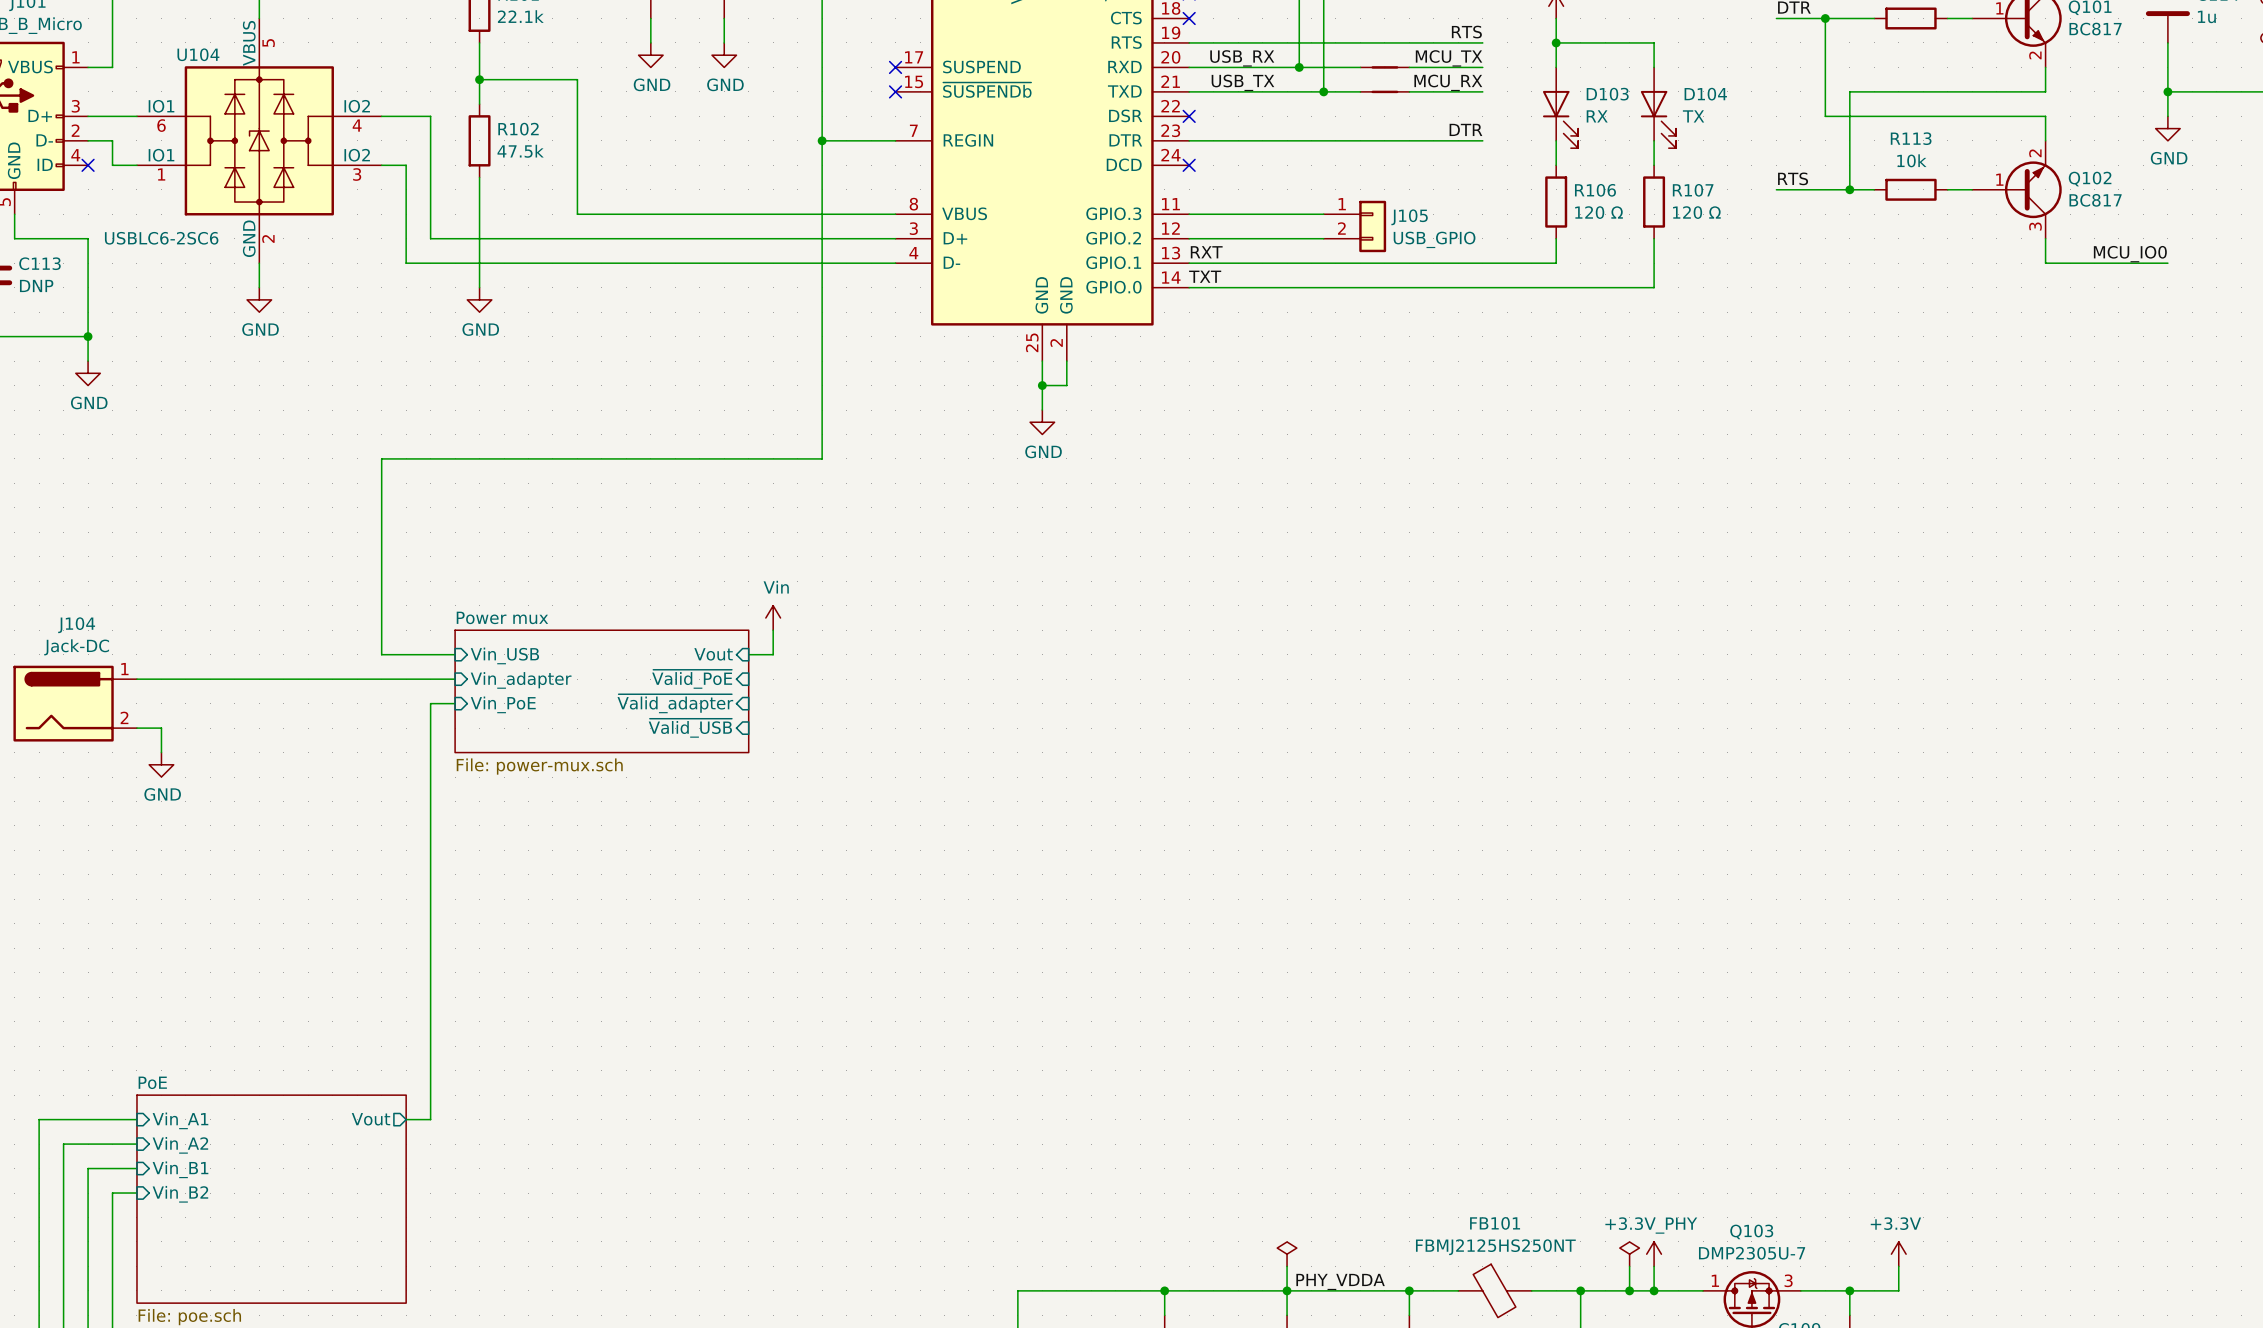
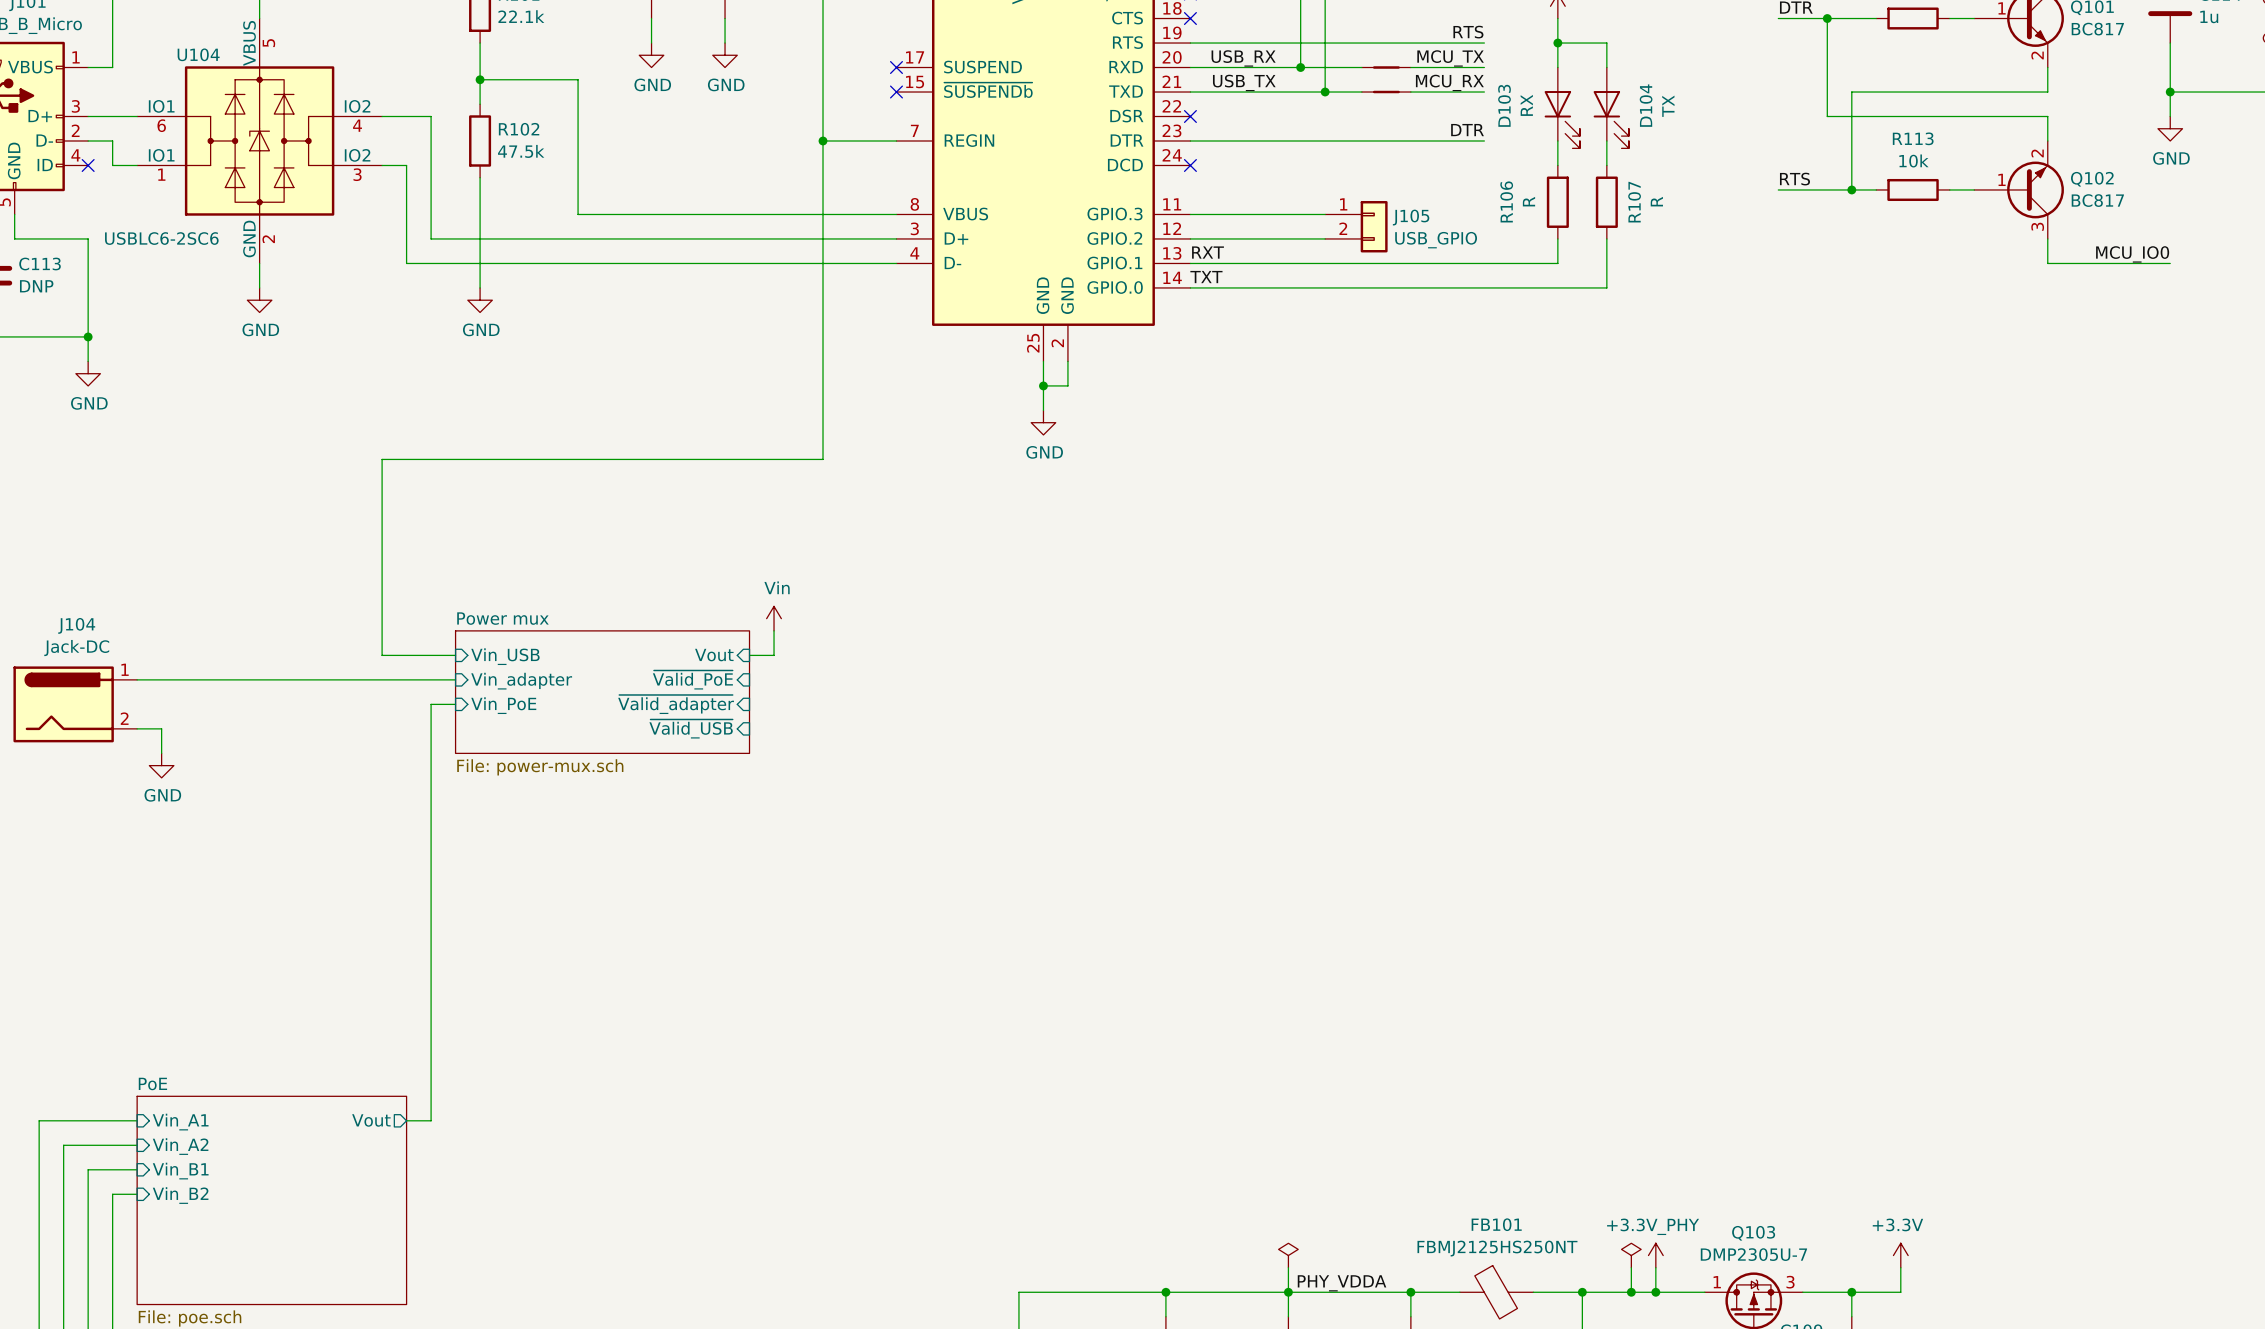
wire: (1605, 42) (1654, 42) (1654, 67) -> (1606, 43) (1606, 67)
D103 name rotation: 0° (1607, 94) -> 90° counterclockwise (1504, 105)
D103 name position: D103 (1607, 94) -> D103 (1504, 105)
D104 name rotation: 0° (1705, 94) -> 90° counterclockwise (1646, 105)
D104 position: (1658, 107) -> (1611, 107)
D103 value rotation: 0° (1597, 116) -> 90° counterclockwise (1526, 105)
D103 value position: RX (1597, 116) -> RX (1526, 105)
D104 value rotation: 0° (1693, 116) -> 90° counterclockwise (1668, 106)
wire: (1654, 140) (1654, 165) -> (1606, 140) (1606, 165)
R106 name rotation: 0° (1595, 190) -> 90° counterclockwise (1506, 201)
R106 name position: R106 (1595, 190) -> R106 (1506, 201)
R107 name rotation: 0° (1693, 190) -> 90° counterclockwise (1634, 202)
R107 position: (1654, 202) -> (1606, 202)
R106 value: 120 Ω (1599, 212) -> R (1528, 201)
R107 value: 120 Ω (1696, 212) -> R (1656, 201)
wire: (1654, 238) (1654, 287) (1605, 287) -> (1606, 238) (1606, 287)

